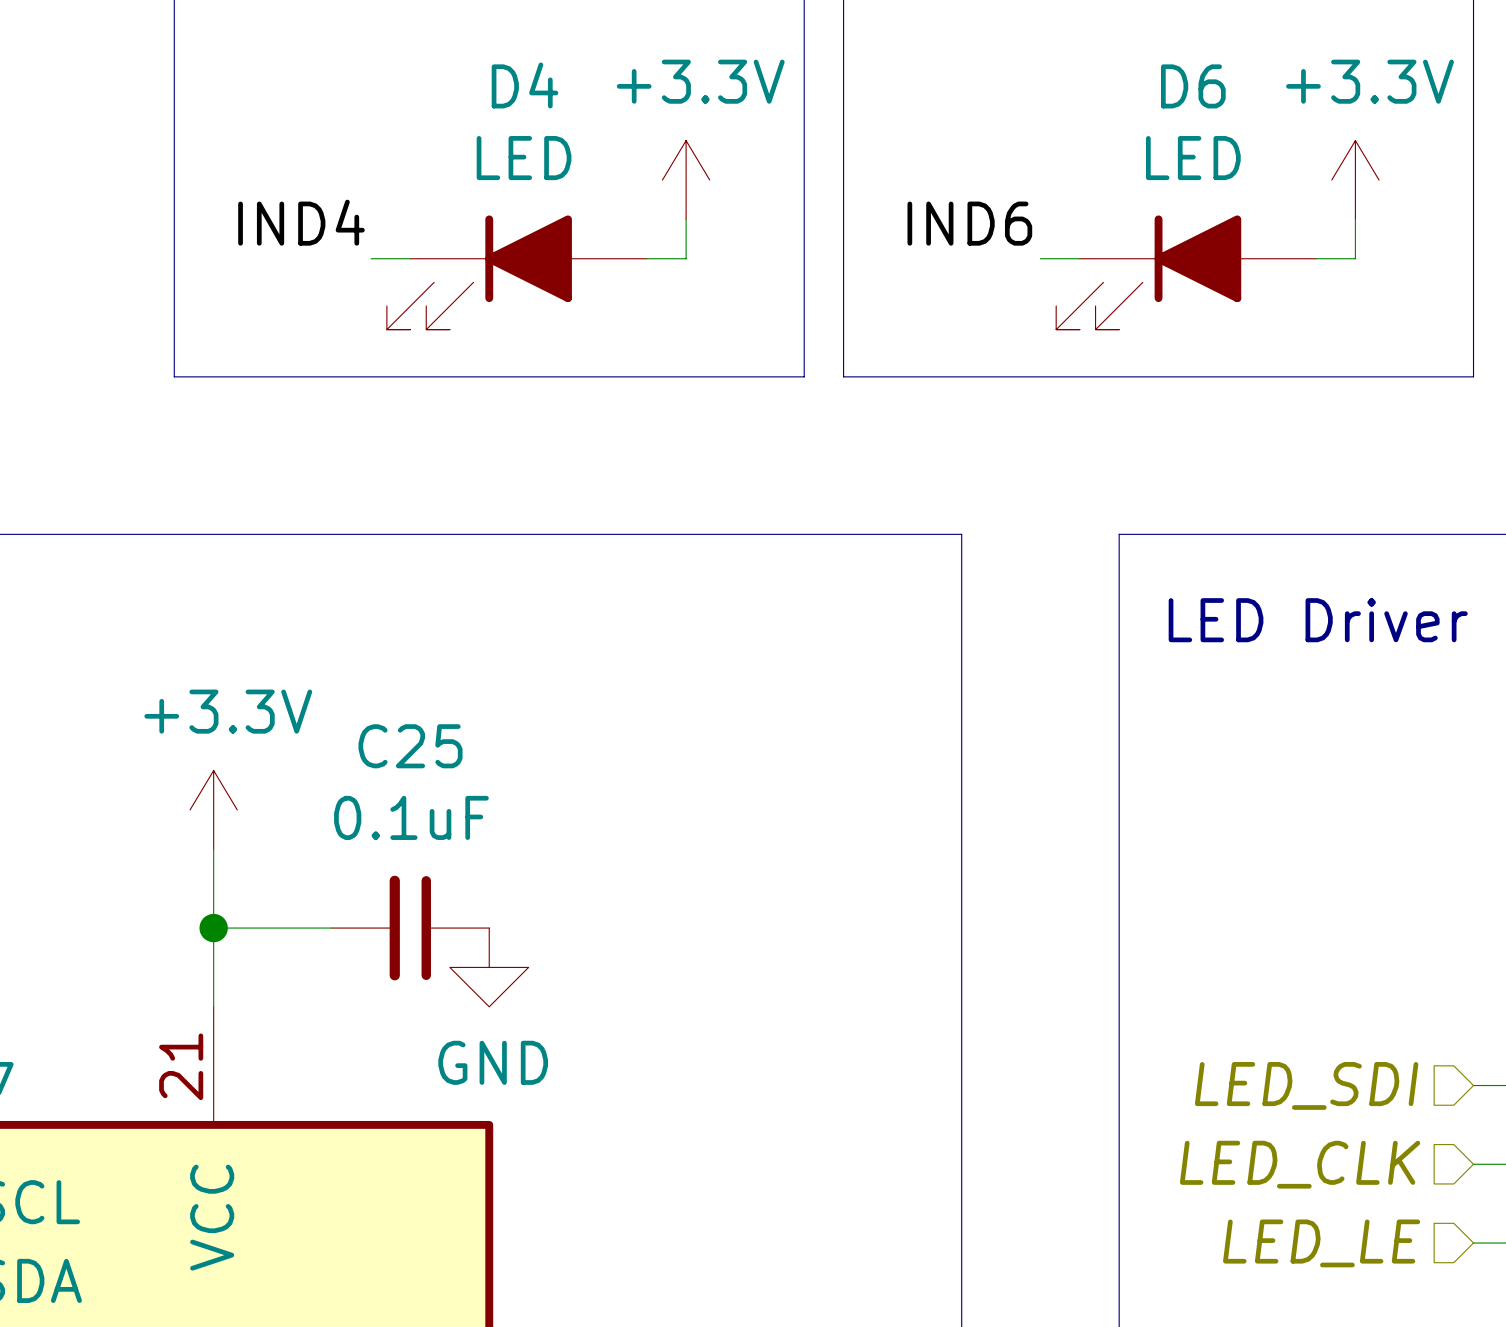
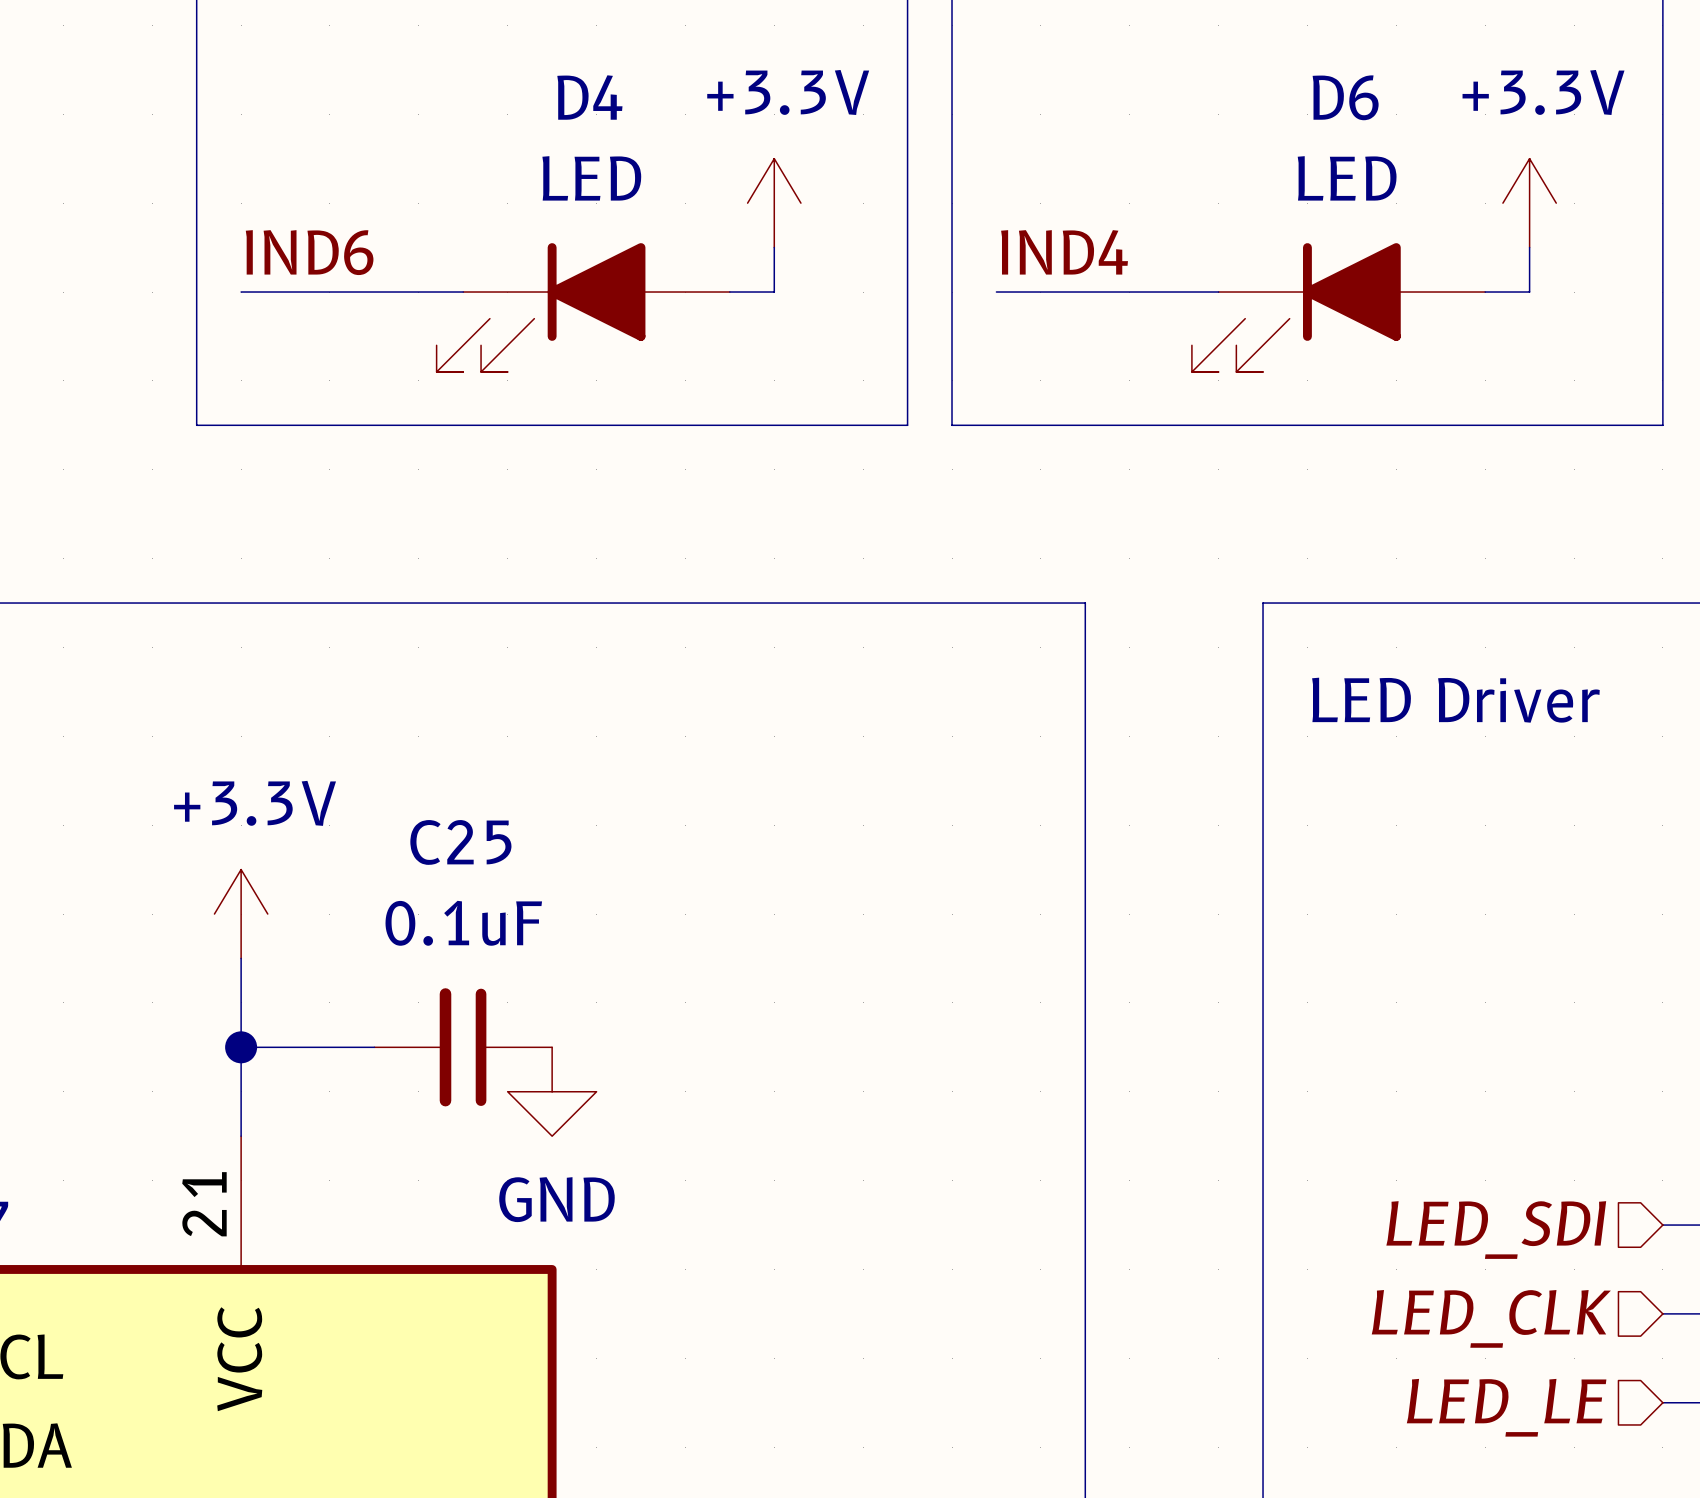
label position: IND4 (301, 222) -> IND4 (1064, 252)
label: none -> IND6 (309, 252)
label: IND6 (969, 223) -> none
wire: none -> (241, 292) (418, 292)
wire: none -> (996, 292) (1174, 292)

